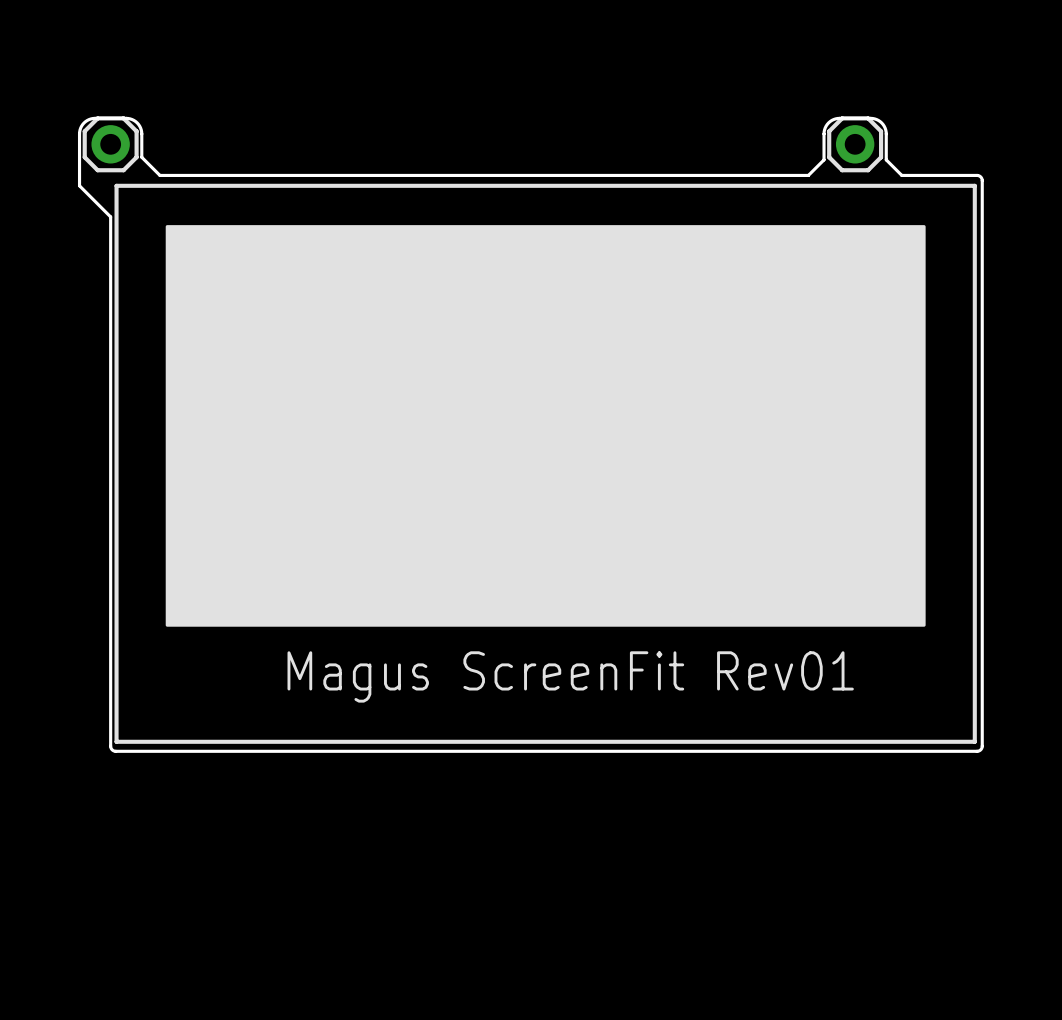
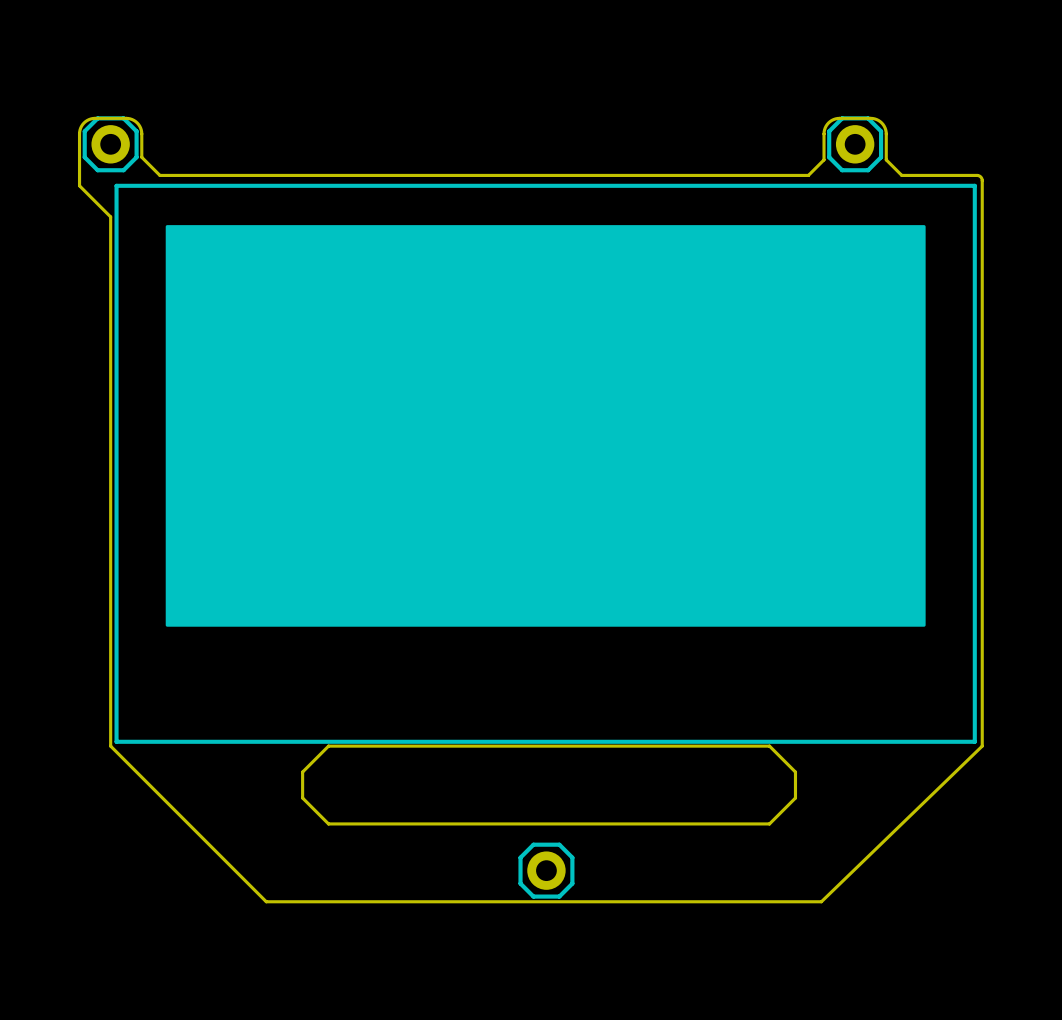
text: Magus ScreenFit Rev01 (570, 676) -> none
board edge: (110, 746) (112, 749) (115, 751) (977, 751) (980, 749) (982, 746) -> (110, 746) (266, 901) (821, 901) (982, 746)
board edge: none -> (328, 746) (302, 772) (302, 798) (328, 823) (769, 823) (795, 798) (795, 772) (769, 746) (328, 746)
part: none -> (546, 870)

